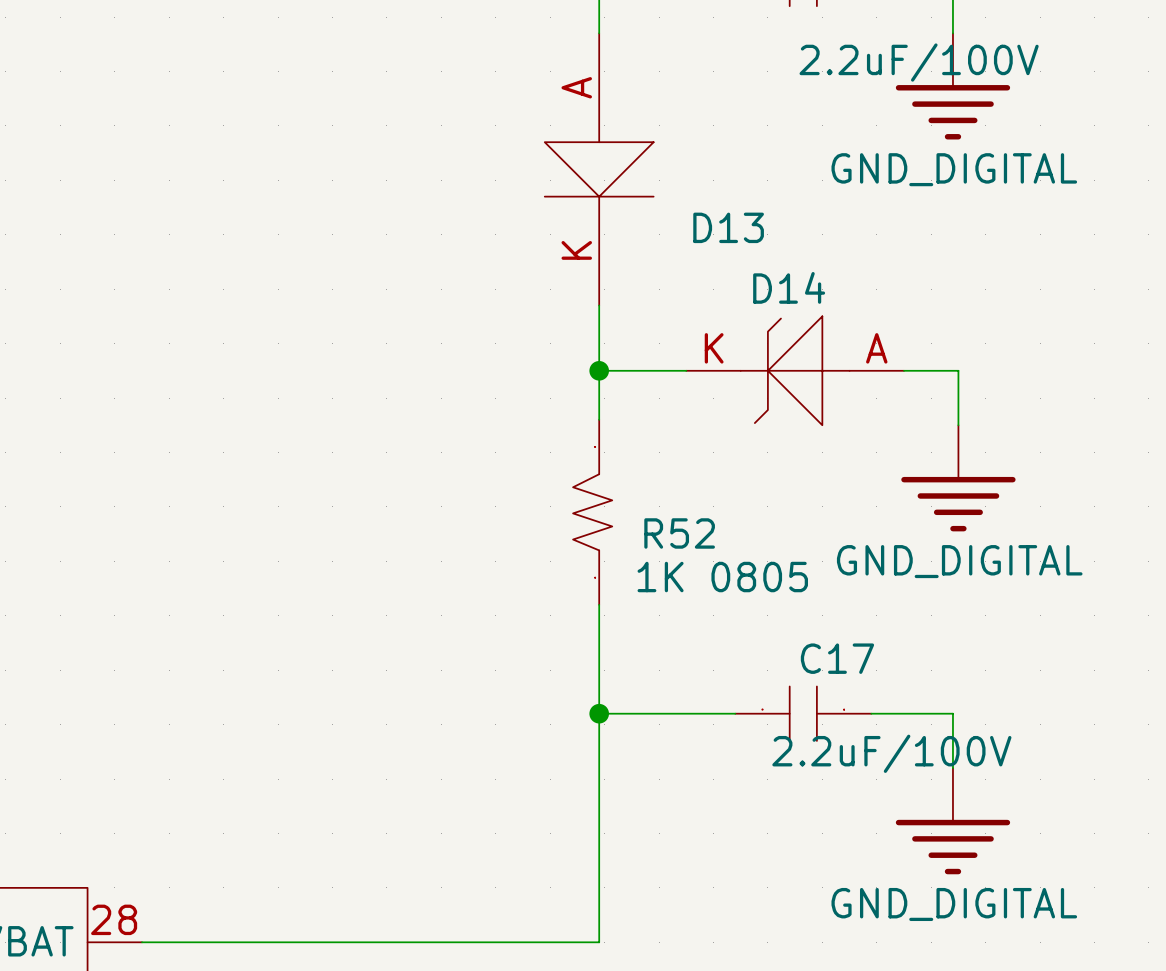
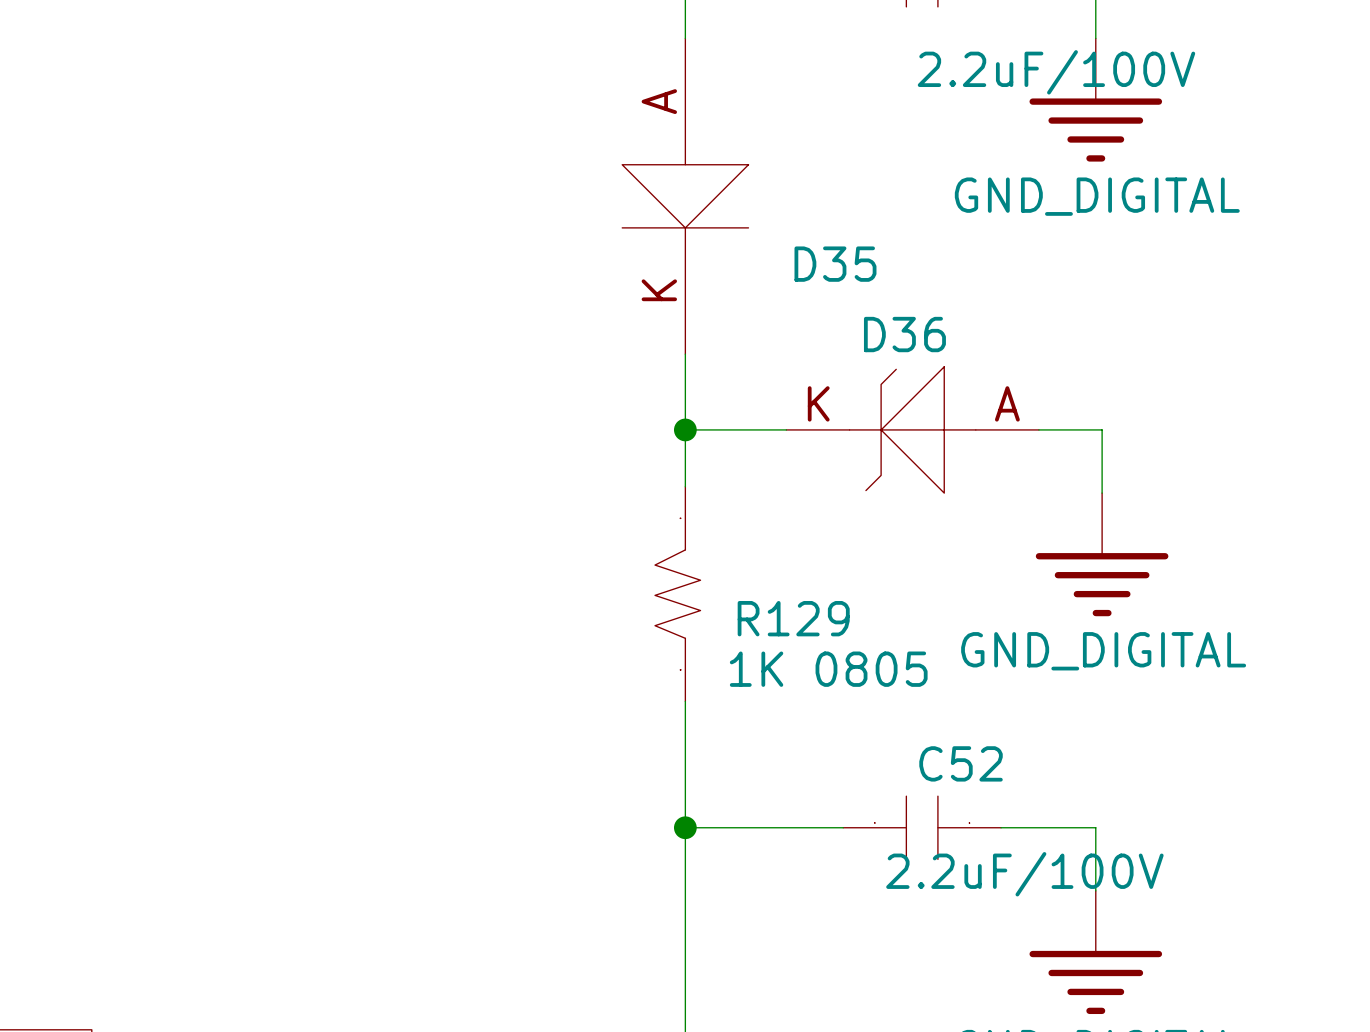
D13 name: D13 (728, 227) -> D35 (835, 264)
D14 name: D14 (789, 287) -> D36 (904, 334)
R52 name: R52 (679, 533) -> R129 (793, 618)
C17 name: C17 (837, 658) -> C52 (961, 763)

